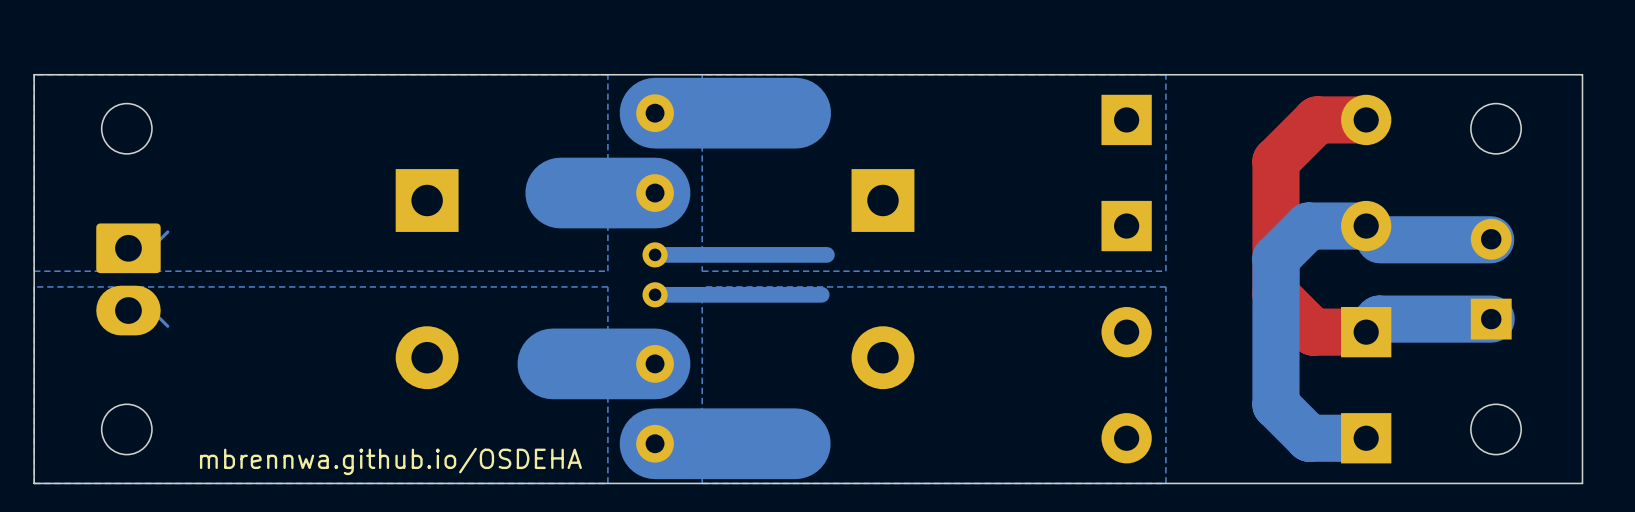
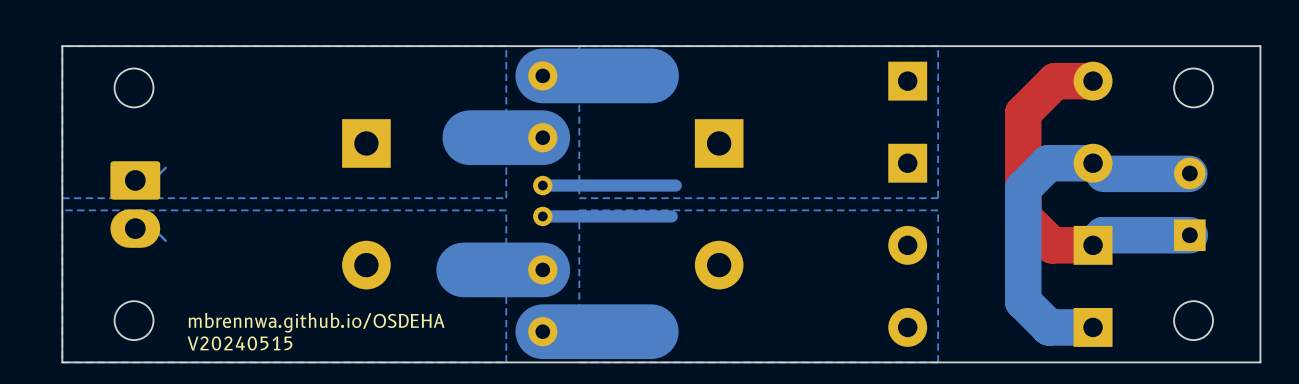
text: none -> mbrennwa.github.io/OSDEHA (316, 322)
text: mbrennwa.github.io/OSDEHA (390, 461) -> V20240515 (240, 343)

